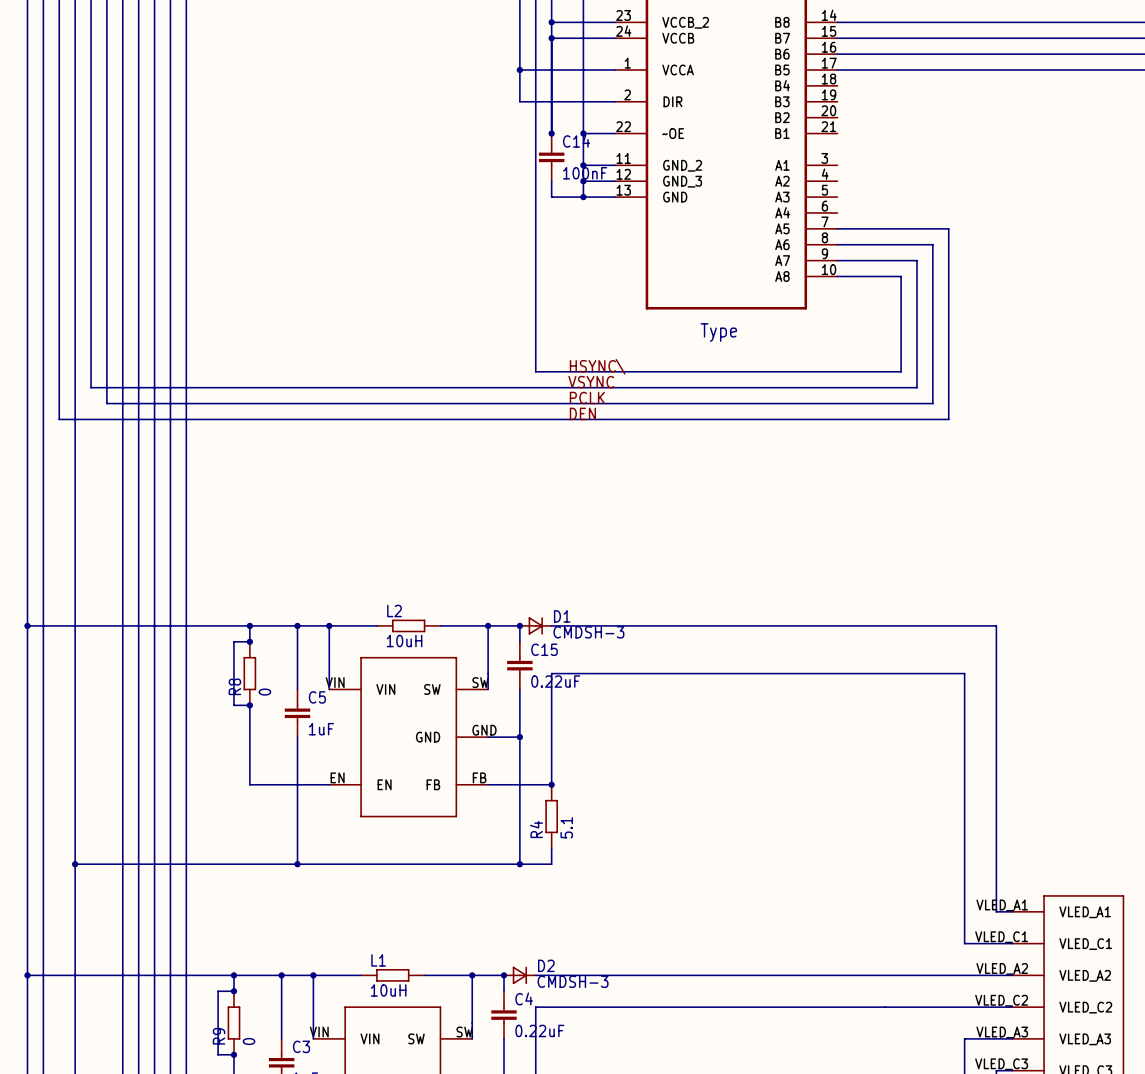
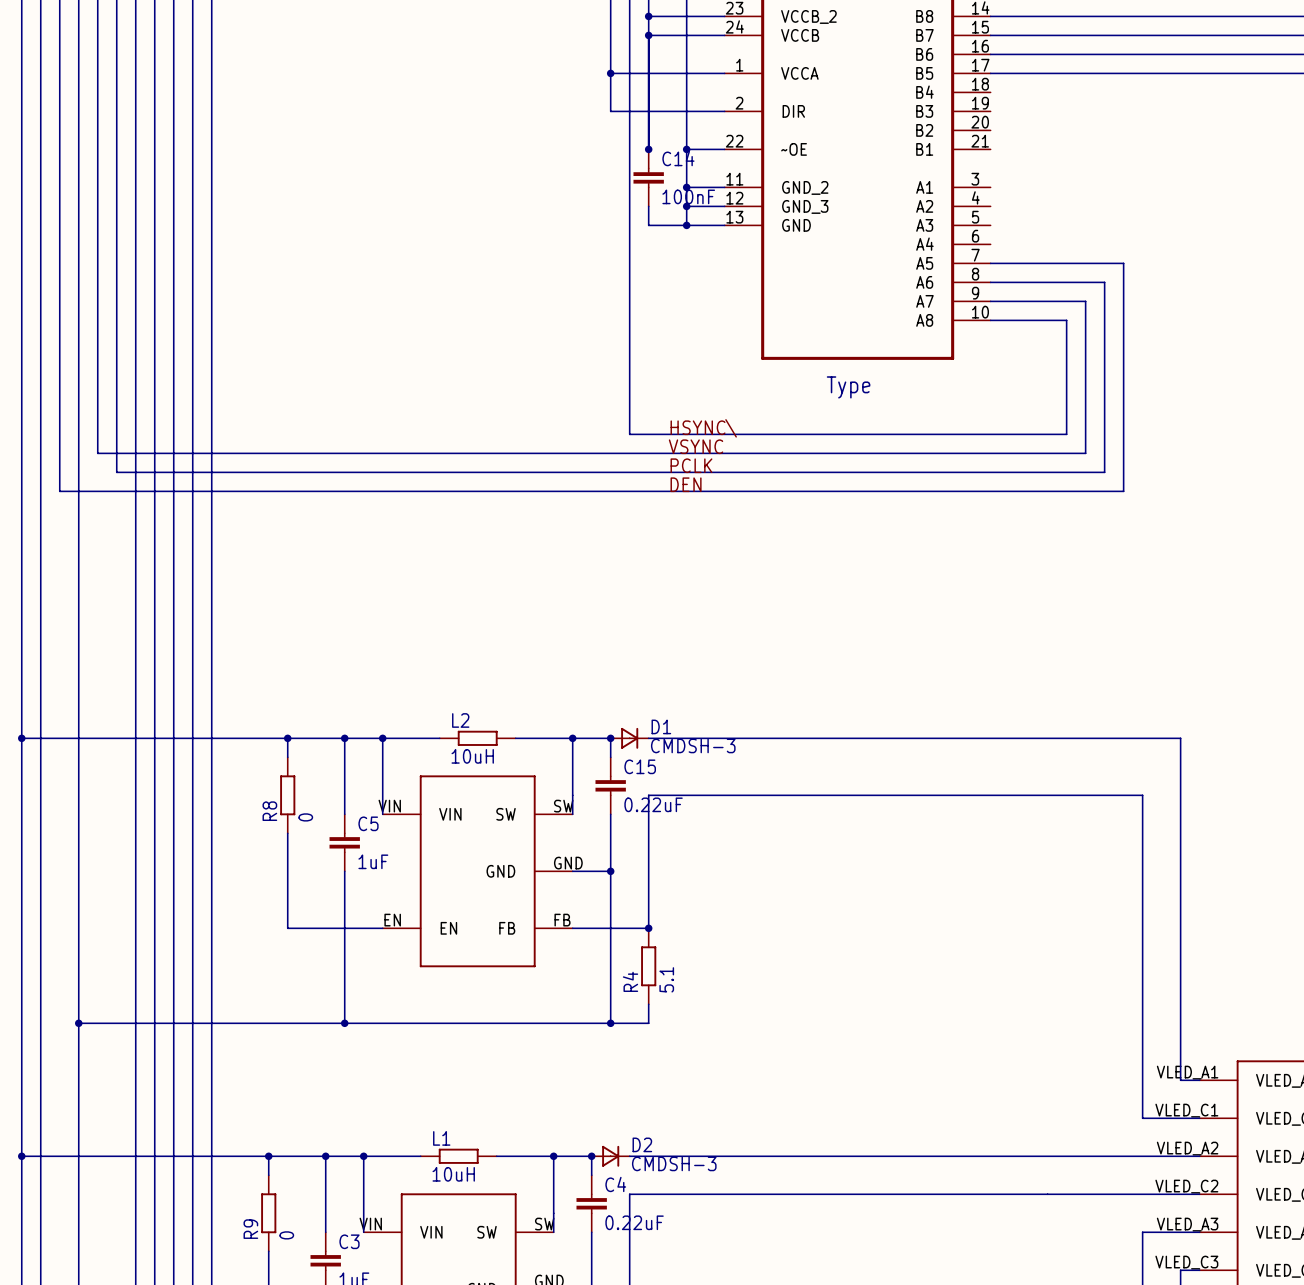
wire: (249, 641) (233, 641) (233, 705) (249, 705) -> none
junction: (249, 641) -> none
junction: (249, 705) -> none
wire: (233, 991) (218, 991) (218, 1054) (233, 1054) -> none
junction: (233, 991) -> none
junction: (233, 1054) -> none

